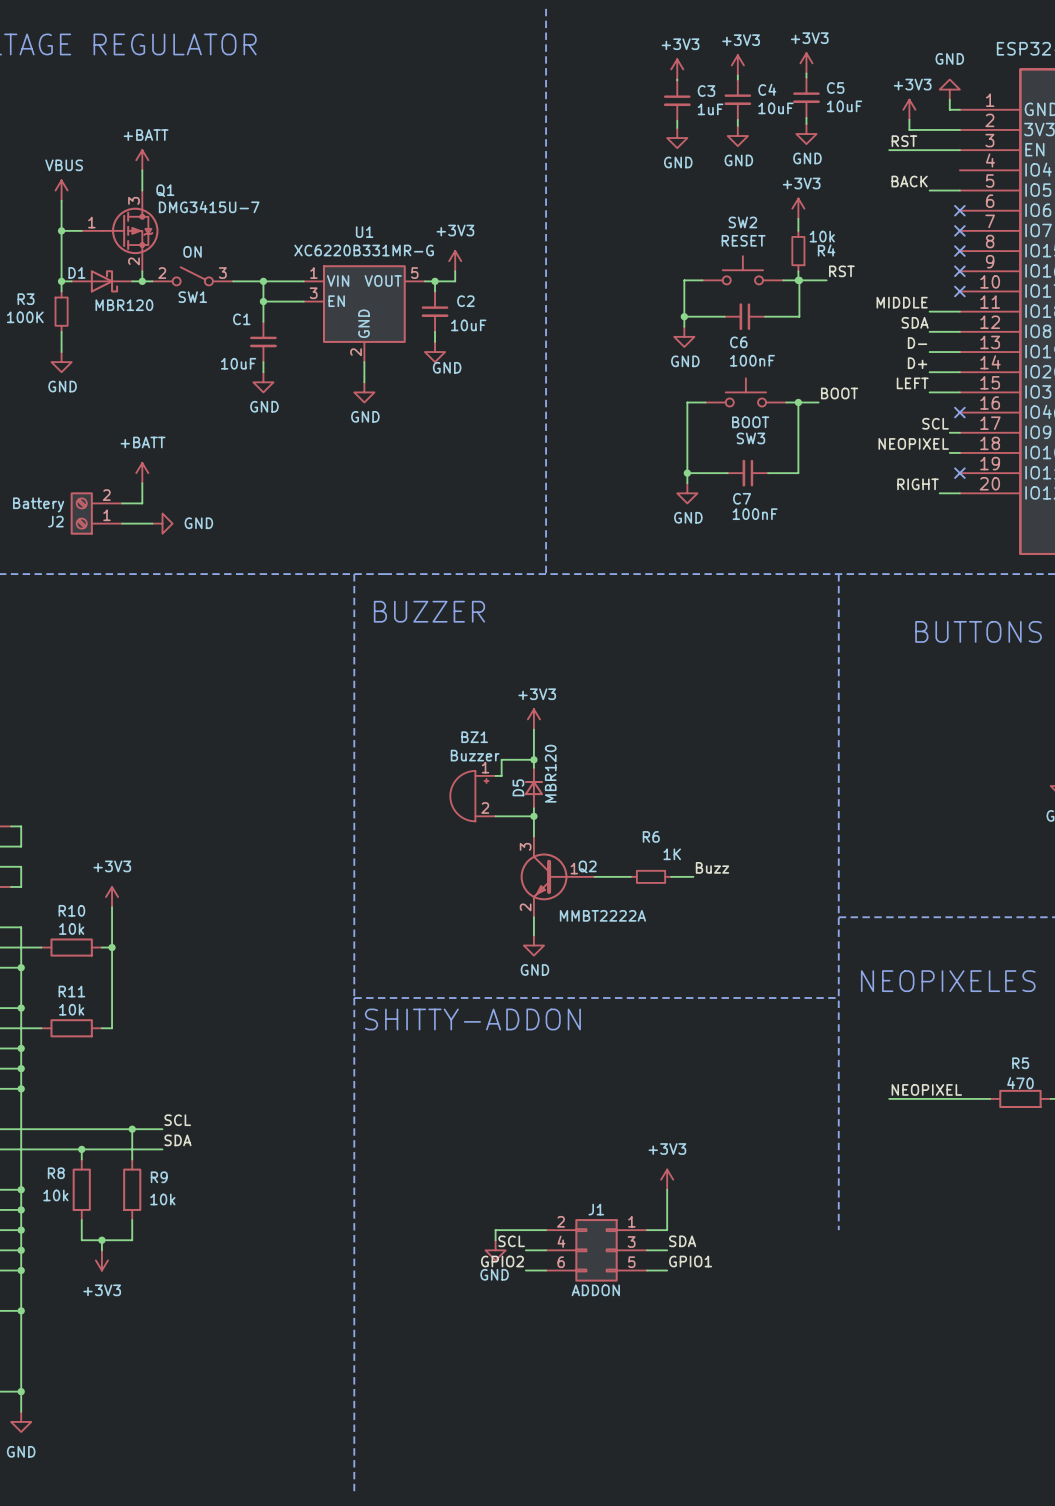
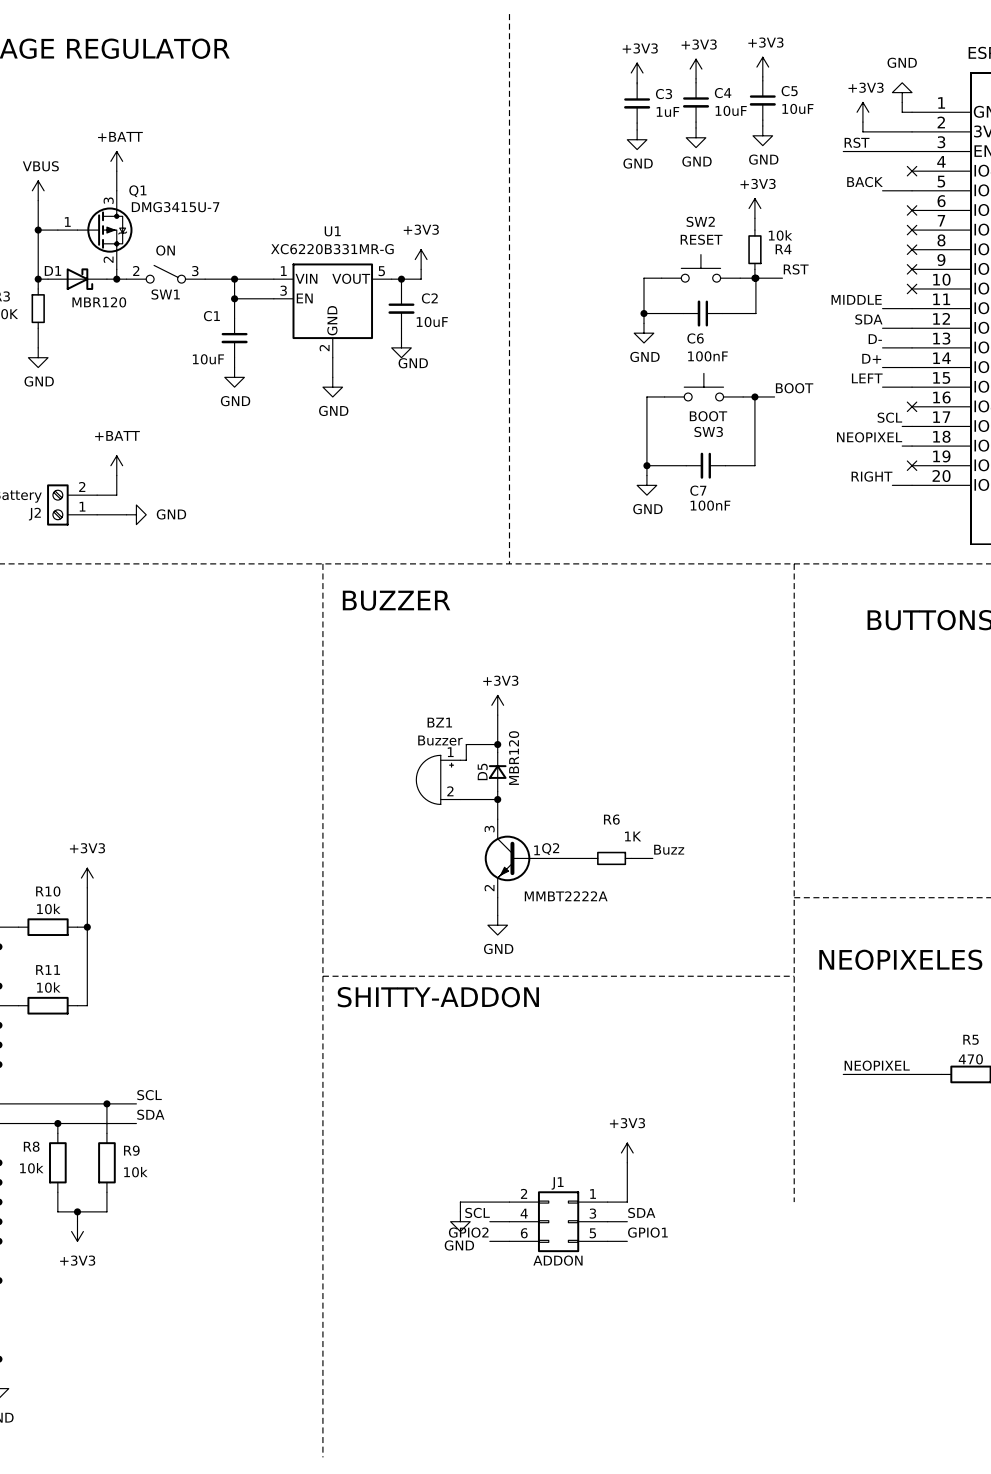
no-connect mark: none -> (912, 171)

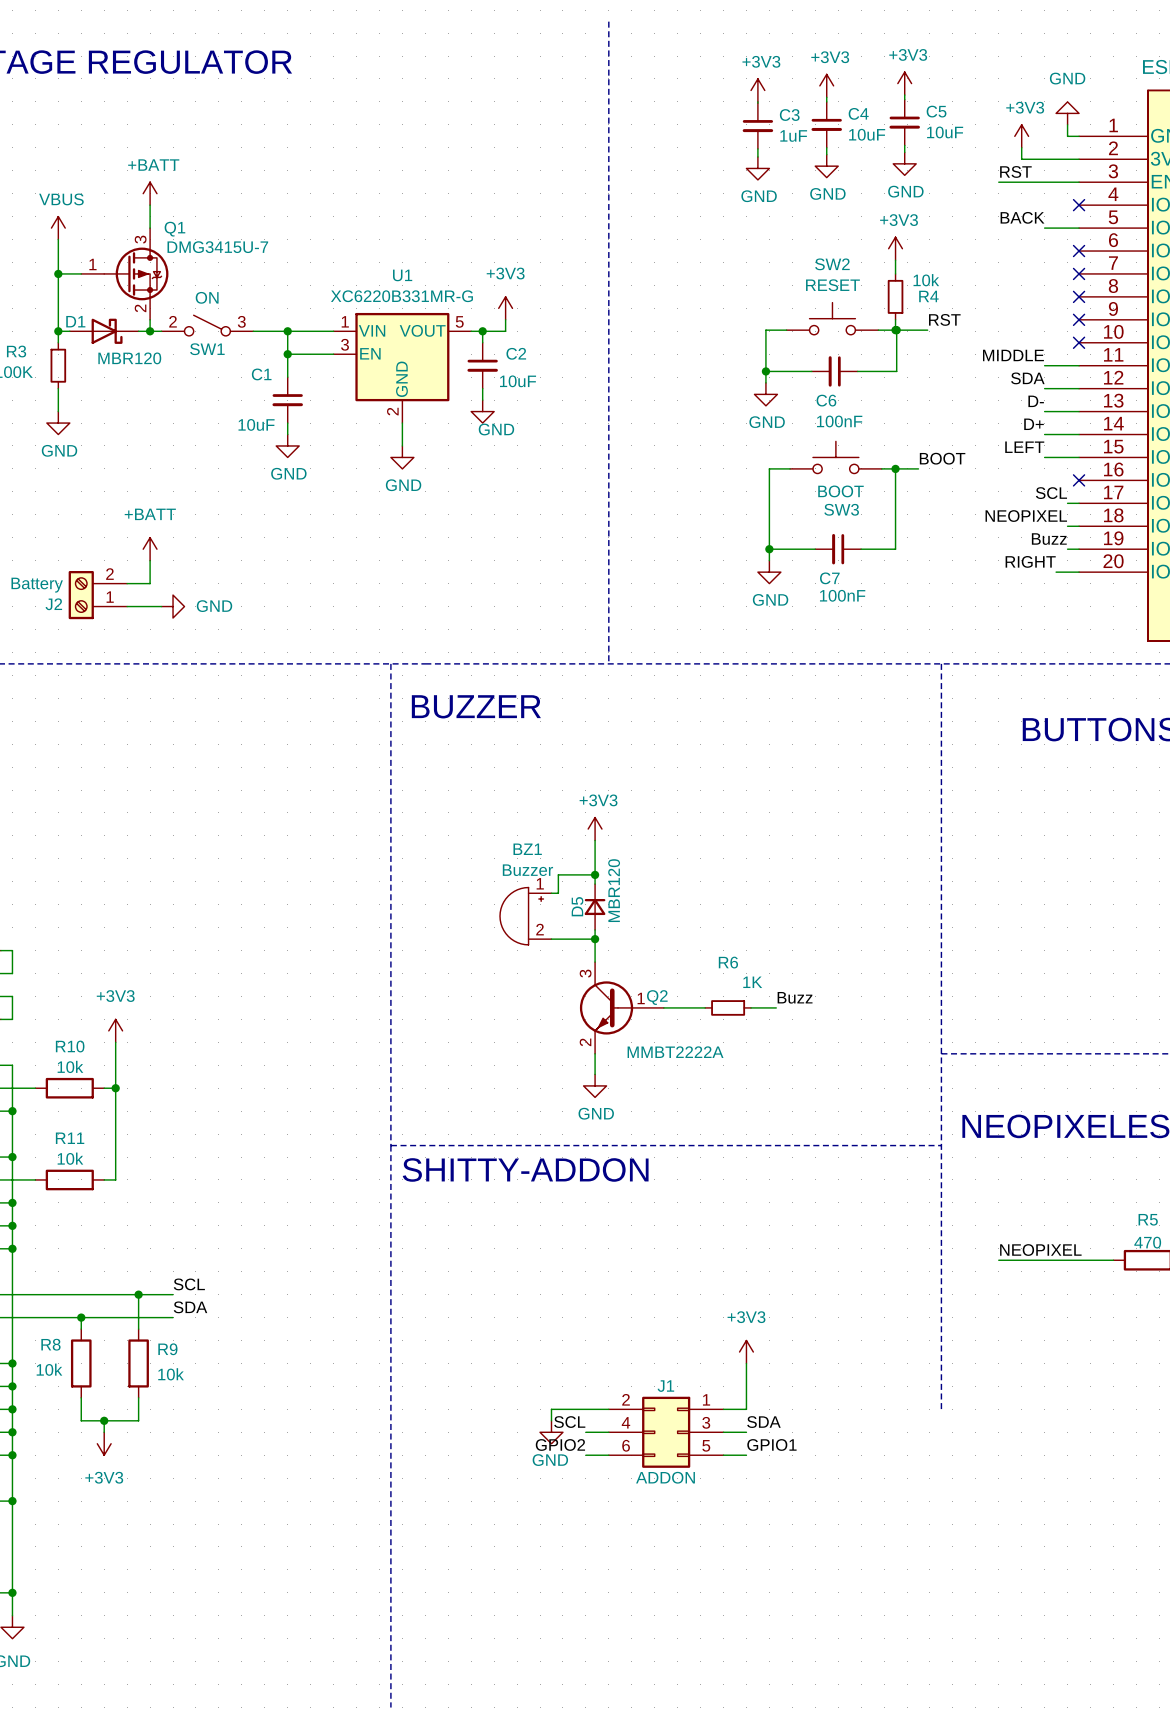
label: none -> Buzz (1049, 539)
wire: none -> (1067, 549) (1079, 549)
no-connect mark: (912, 465) -> none

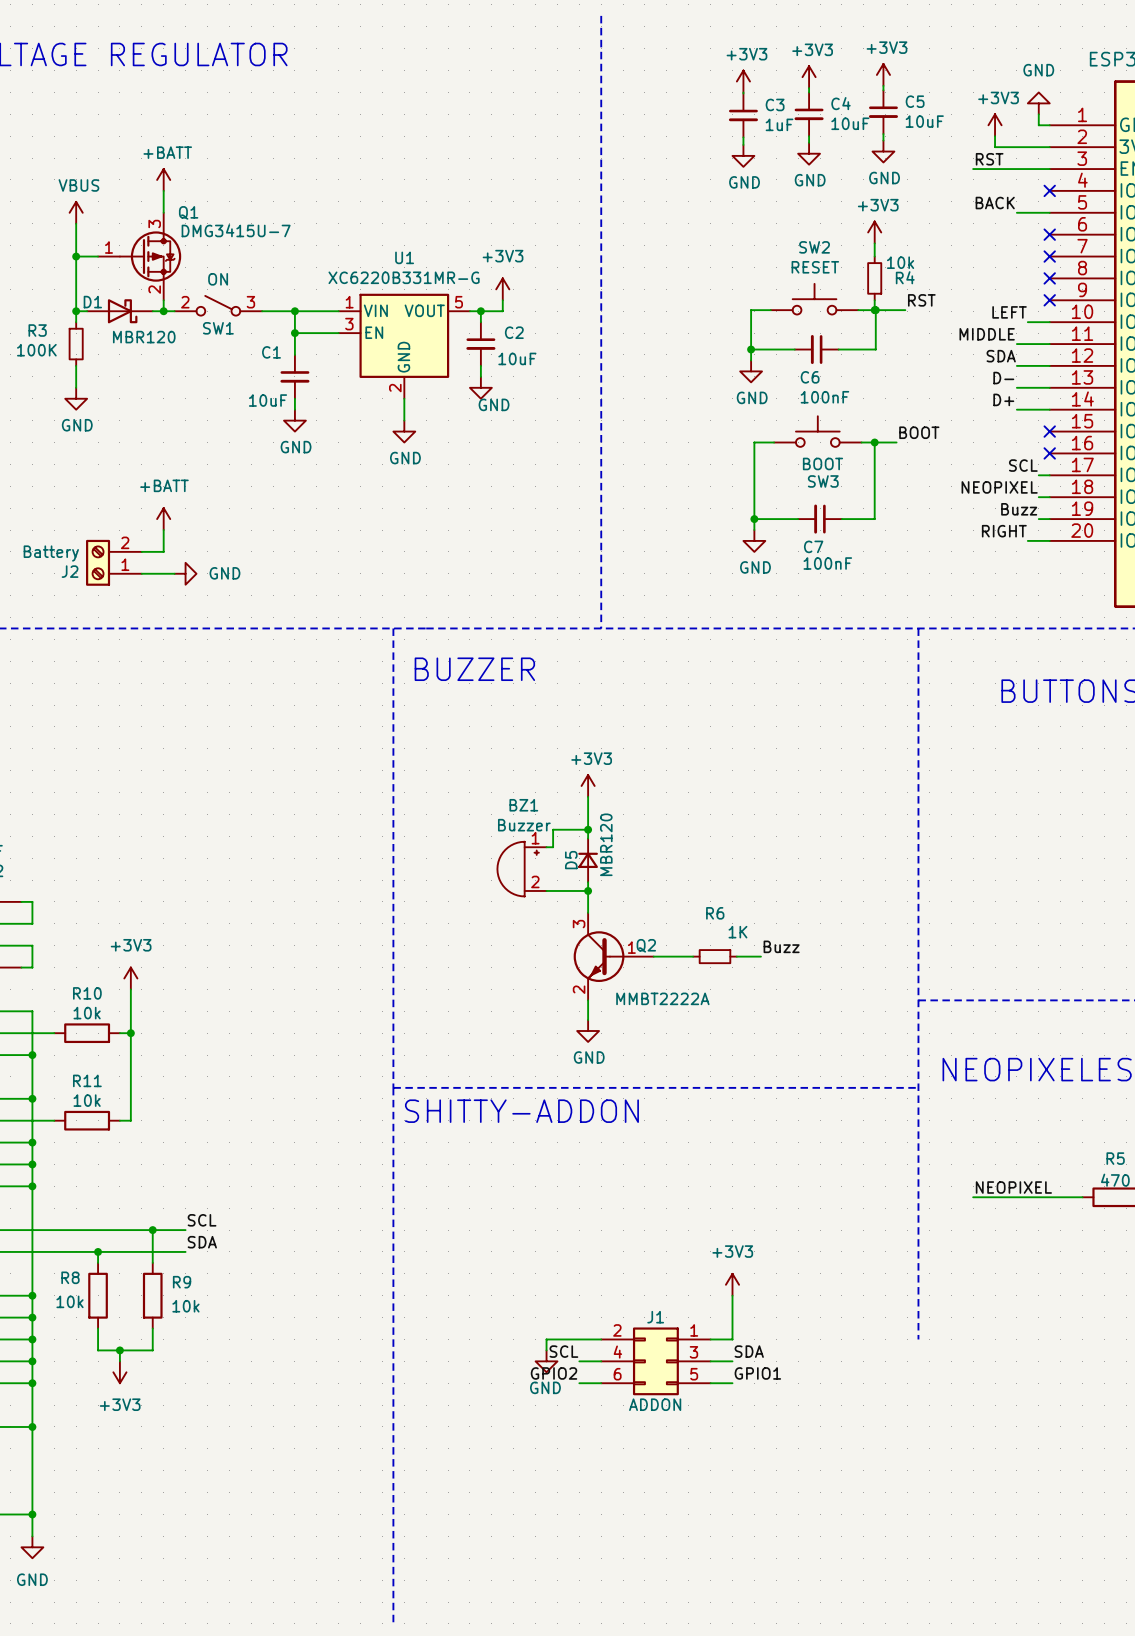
wire: none -> (1027, 322) (1049, 322)
no-connect mark: (1079, 342) -> none
label position: LEFT (1024, 447) -> LEFT (1009, 312)
wire: (1044, 457) (1079, 457) -> none
no-connect mark: none -> (1049, 431)

